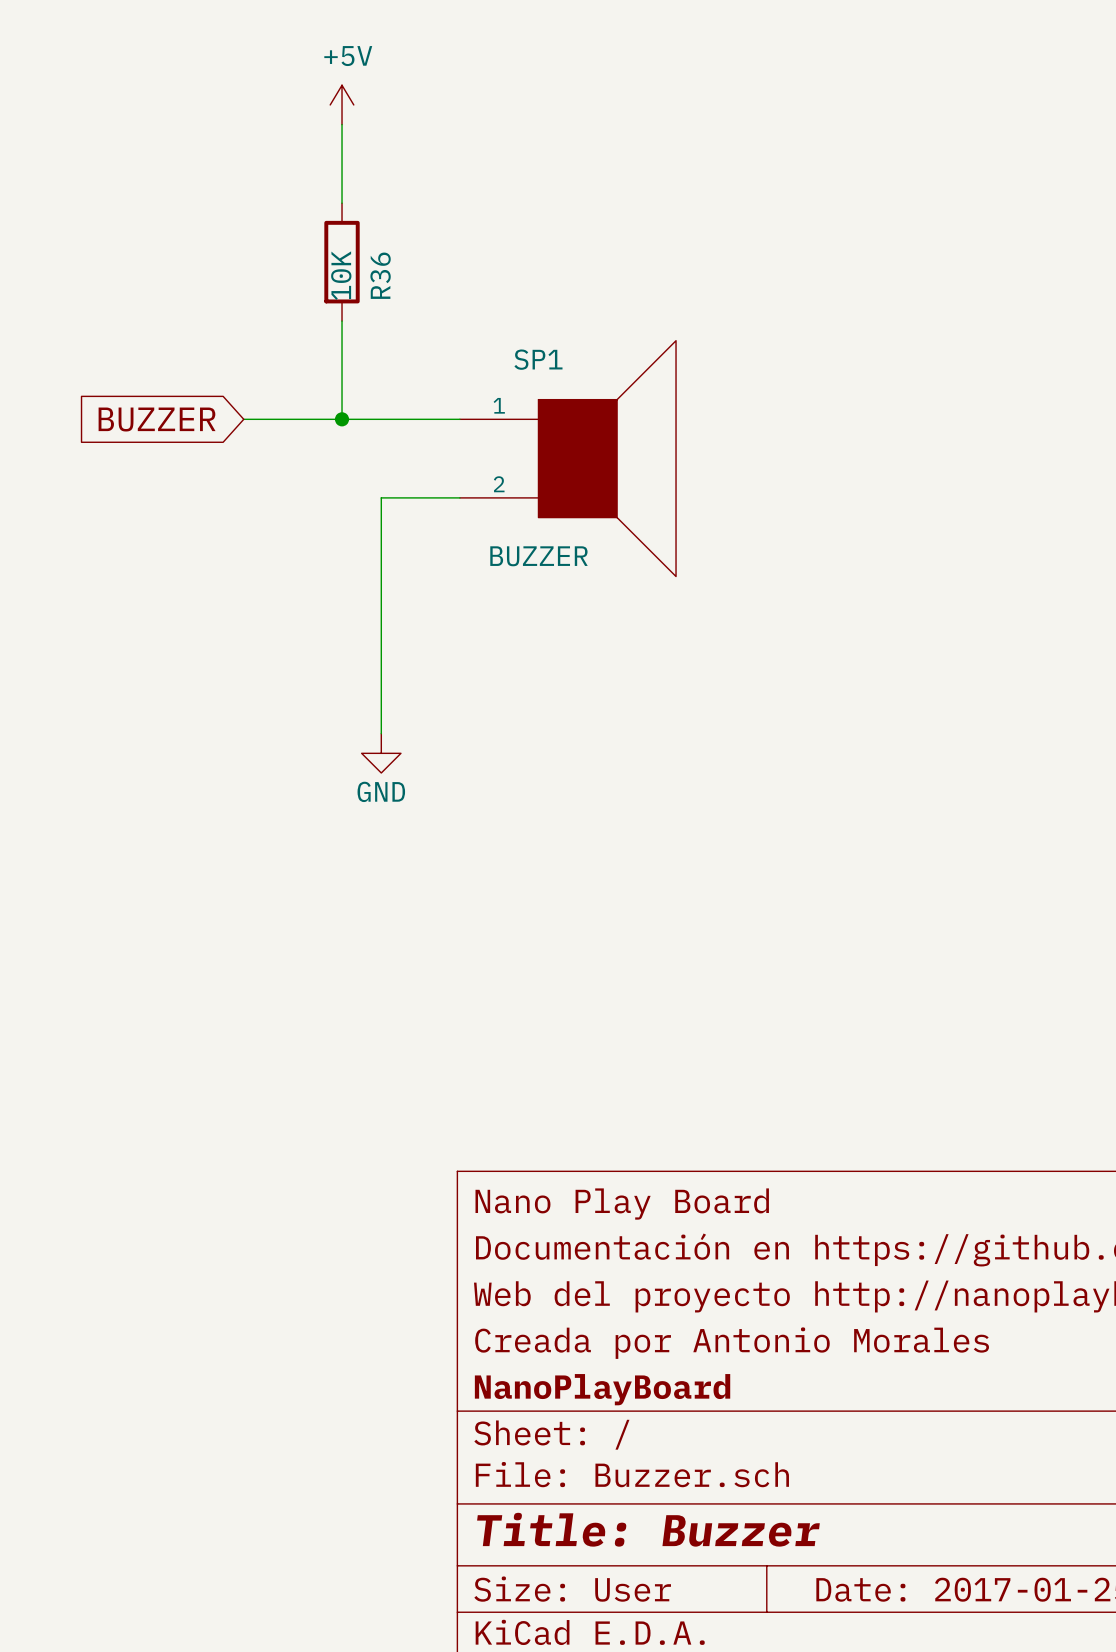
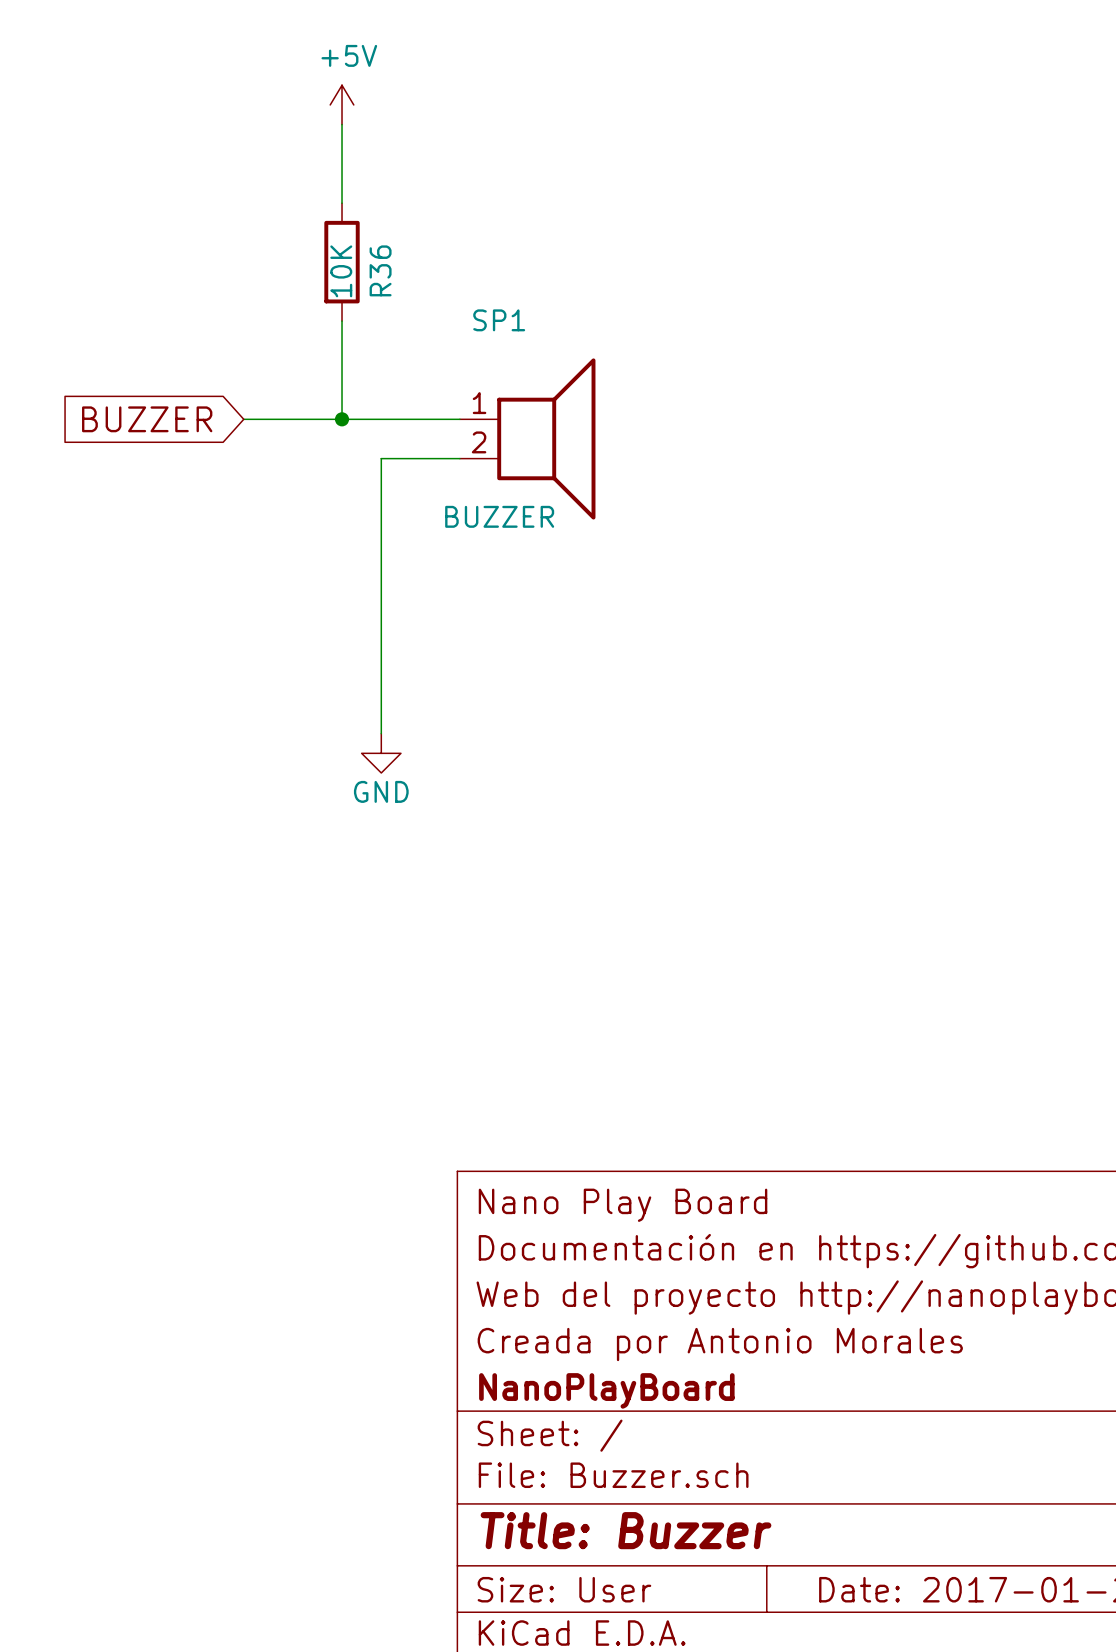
SP1 symbol: [459, 340, 677, 577] -> [459, 358, 596, 520]
wire: (381, 497) (459, 497) -> (381, 497) (381, 458) (459, 458)

